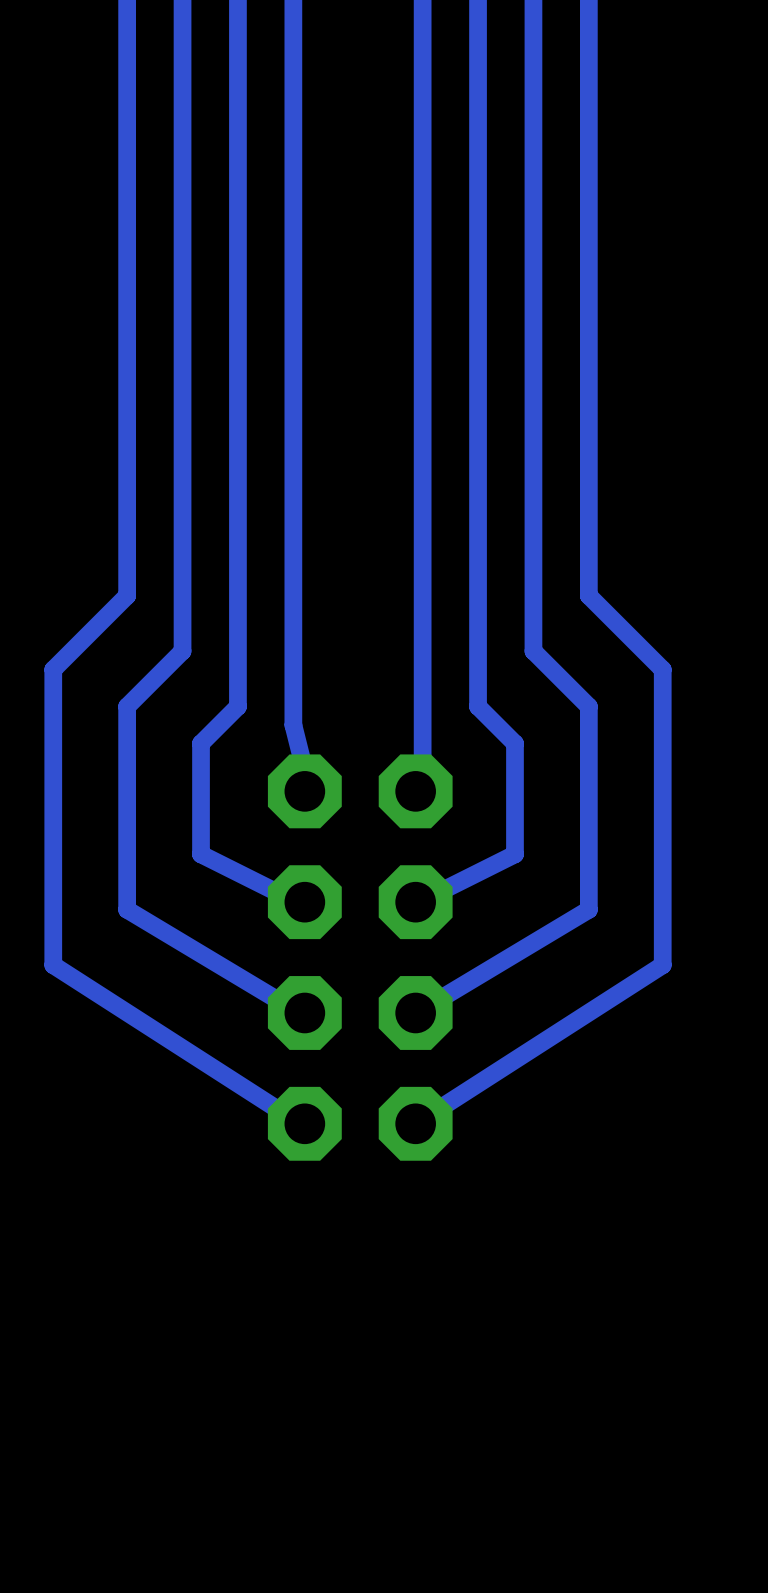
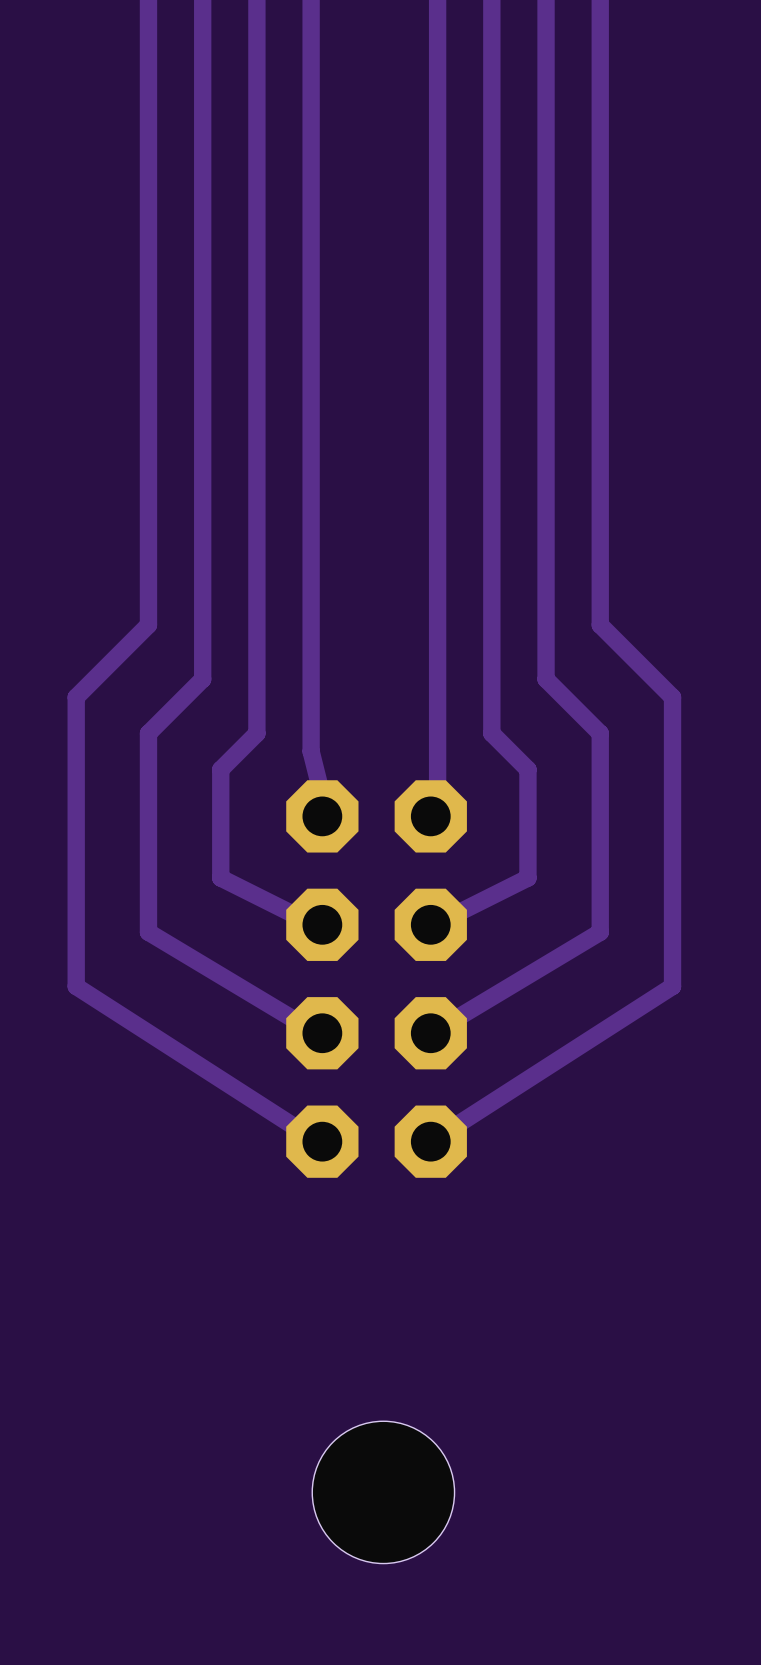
hole: none -> (383, 1492)

